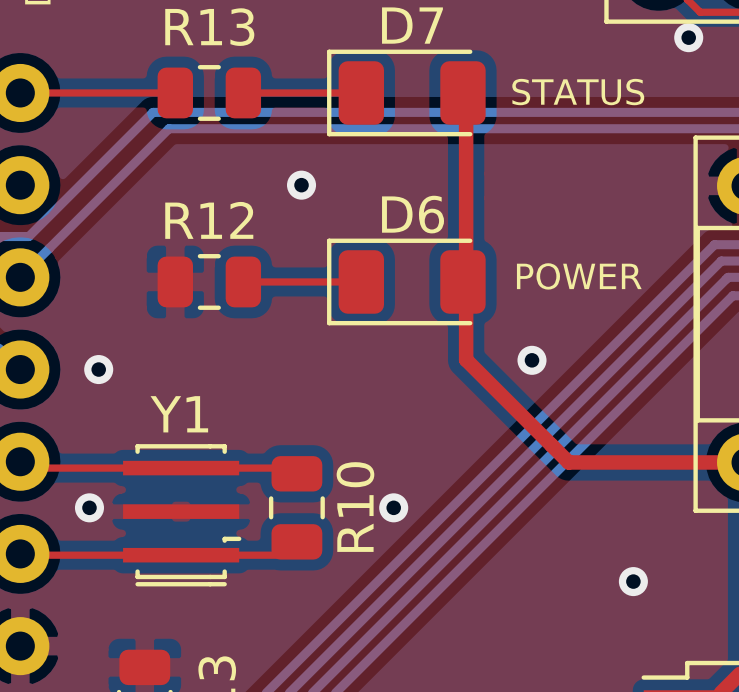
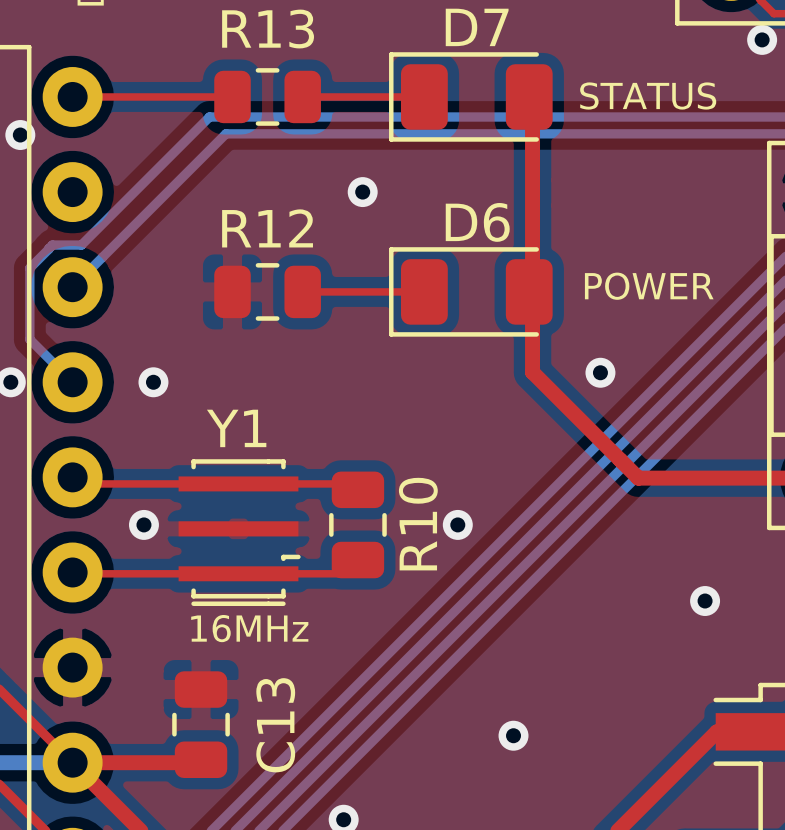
text: none -> 16MHz (249, 628)

